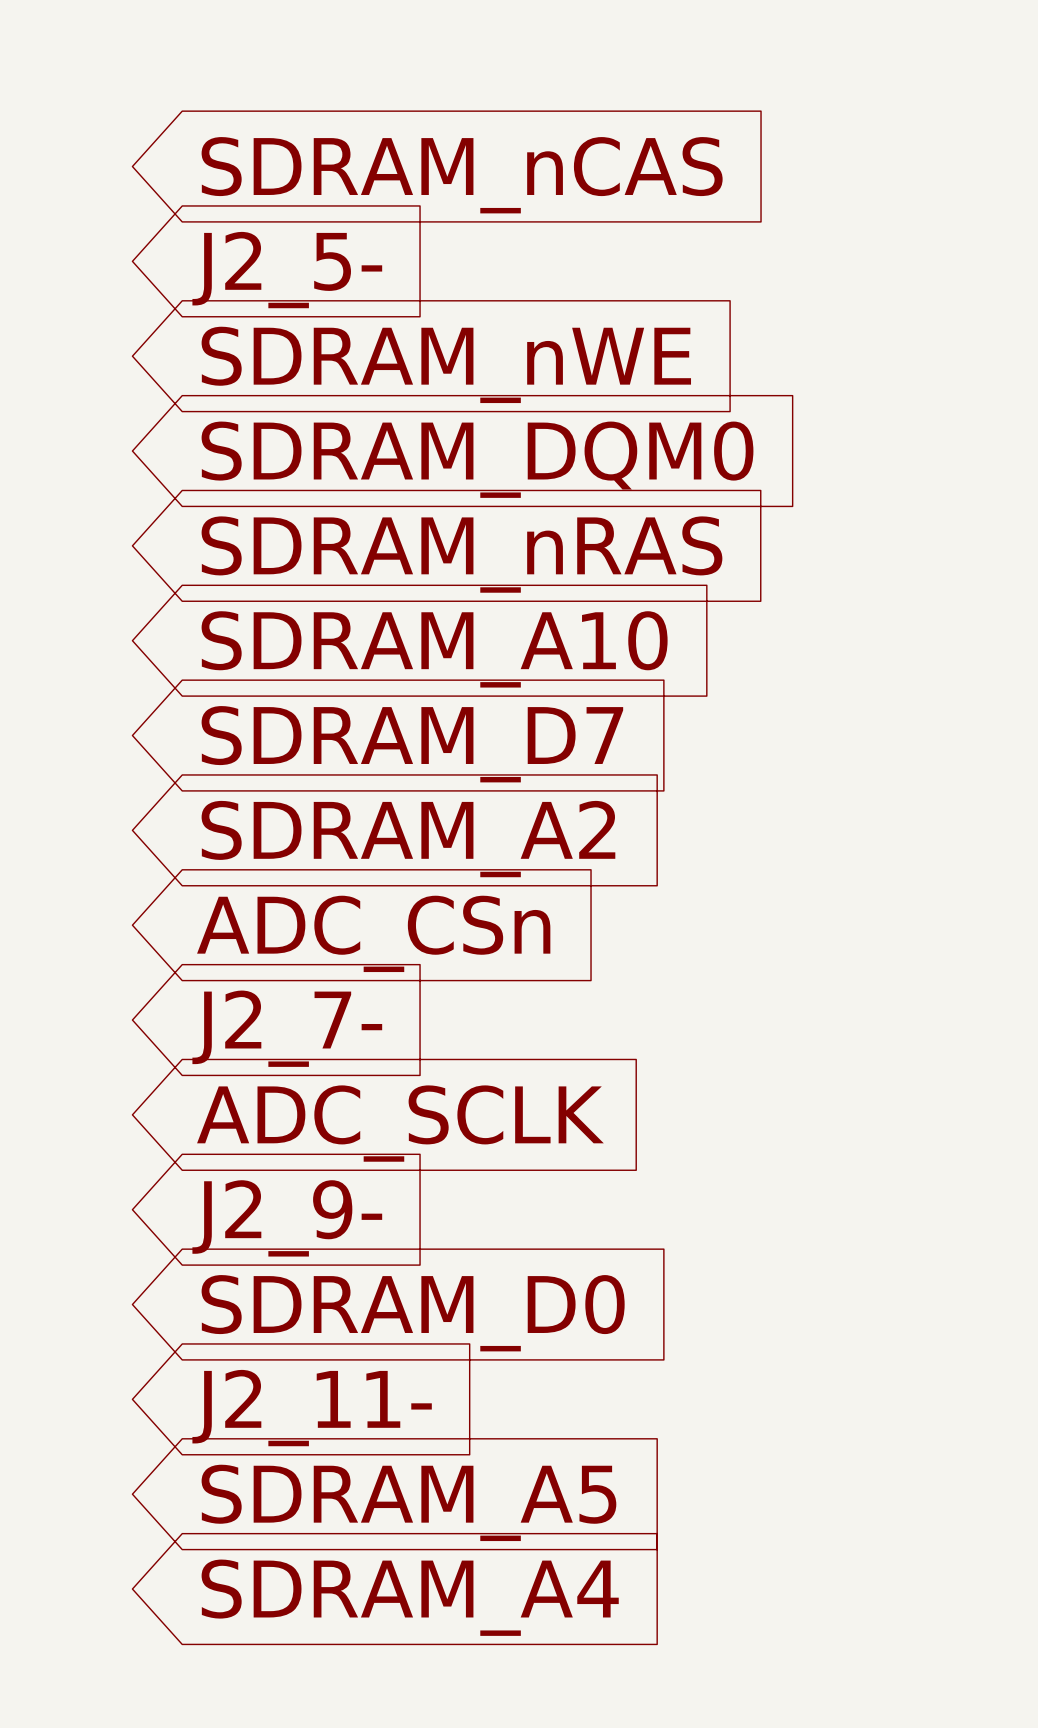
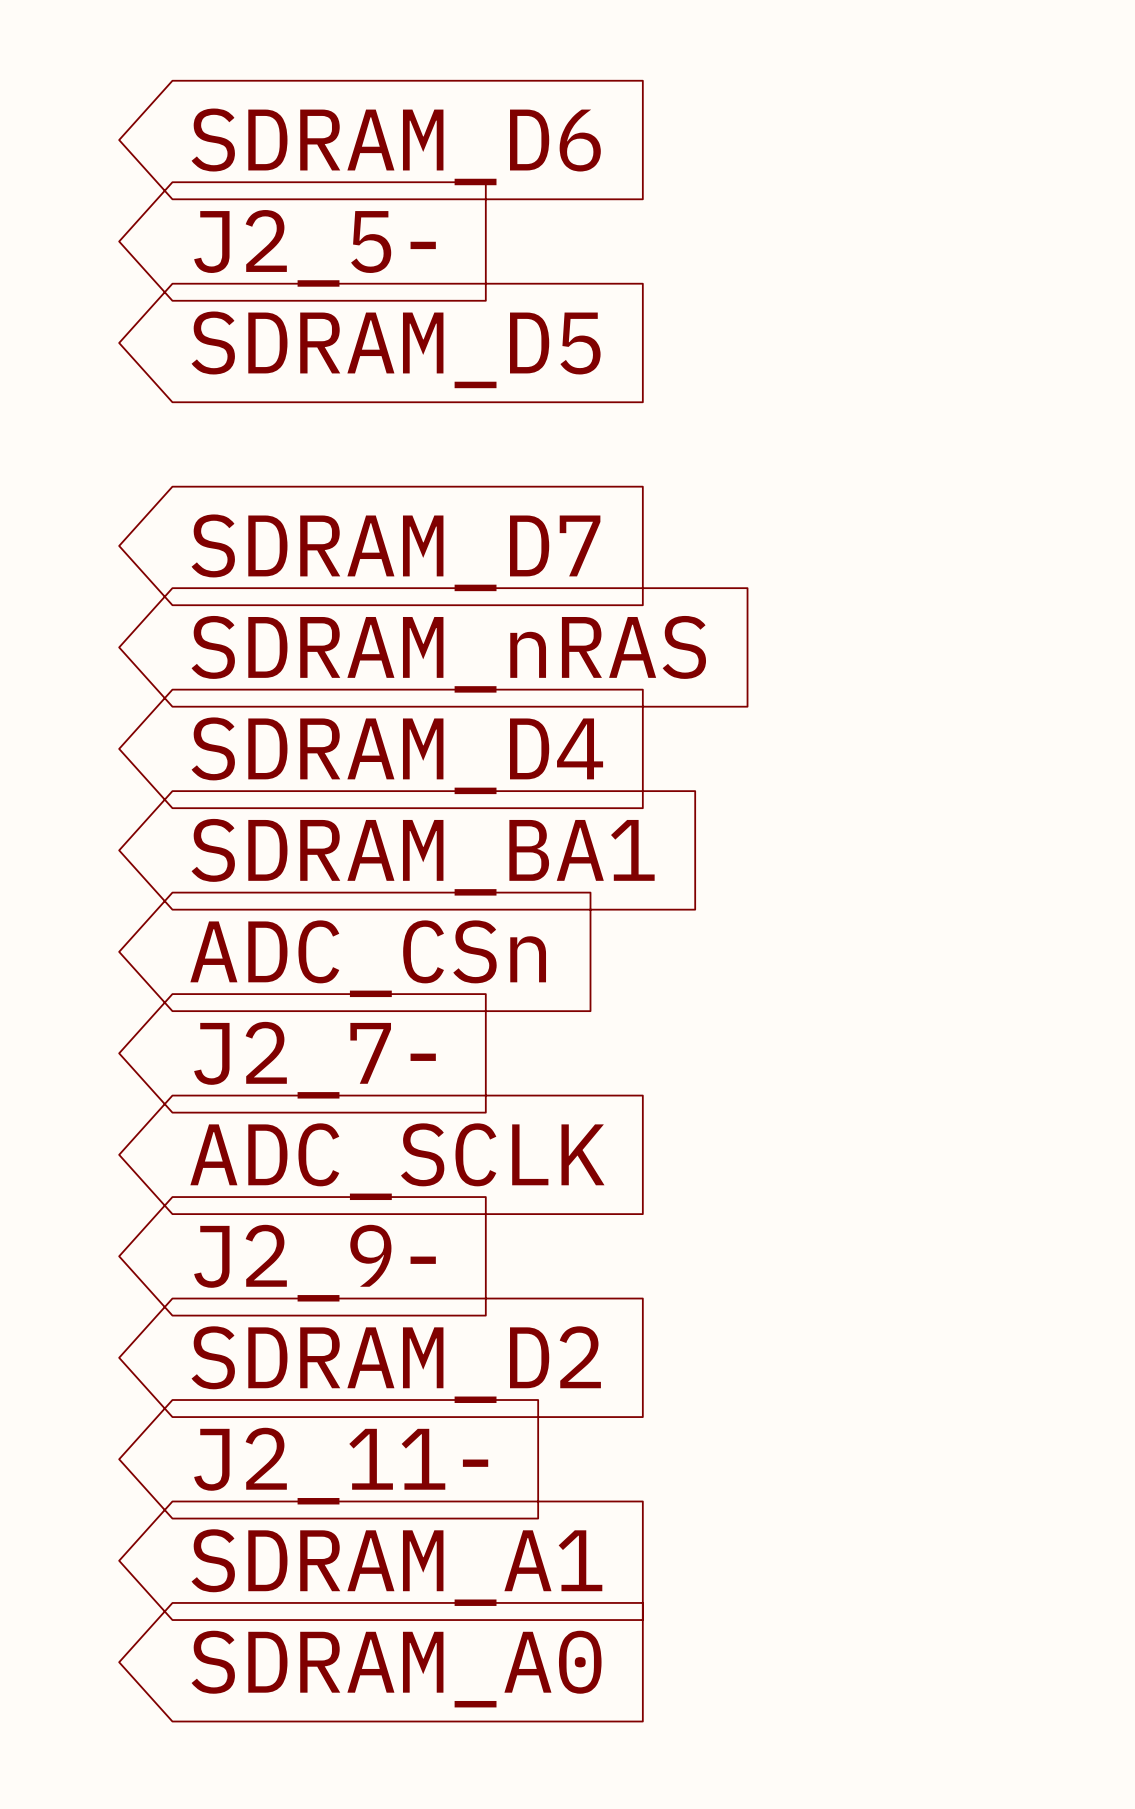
global label: SDRAM_nCAS (462, 175) -> SDRAM_D6 (396, 146)
global label: SDRAM_nWE (446, 364) -> SDRAM_D5 (396, 349)
global label: SDRAM_DQM0 (477, 459) -> none
global label: SDRAM_nRAS (461, 554) -> SDRAM_D7 (395, 552)
global label: SDRAM_A10 (434, 649) -> SDRAM_nRAS (448, 654)
global label: SDRAM_D7 (412, 744) -> SDRAM_D4 (397, 755)
global label: SDRAM_A2 (408, 839) -> SDRAM_BA1 (423, 857)
global label: SDRAM_D0 (413, 1313) -> SDRAM_D2 (396, 1364)
global label: SDRAM_A5 (408, 1502) -> SDRAM_A1 (396, 1567)
global label: SDRAM_A4 (410, 1597) -> SDRAM_A0 (396, 1669)

